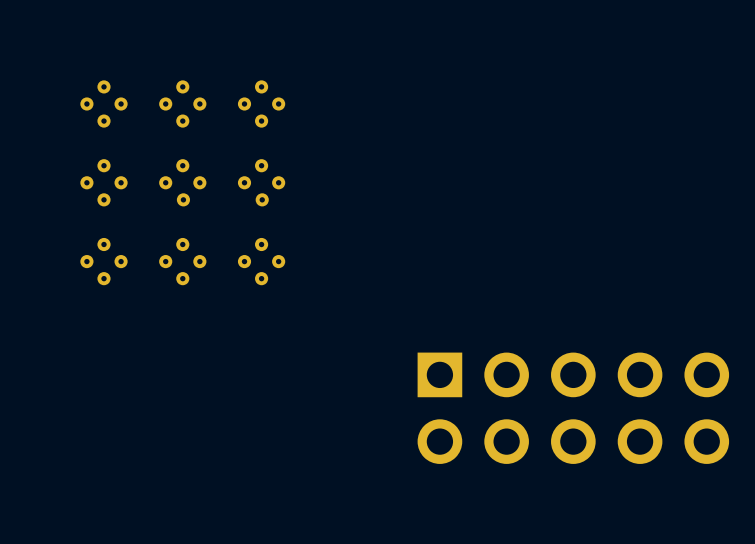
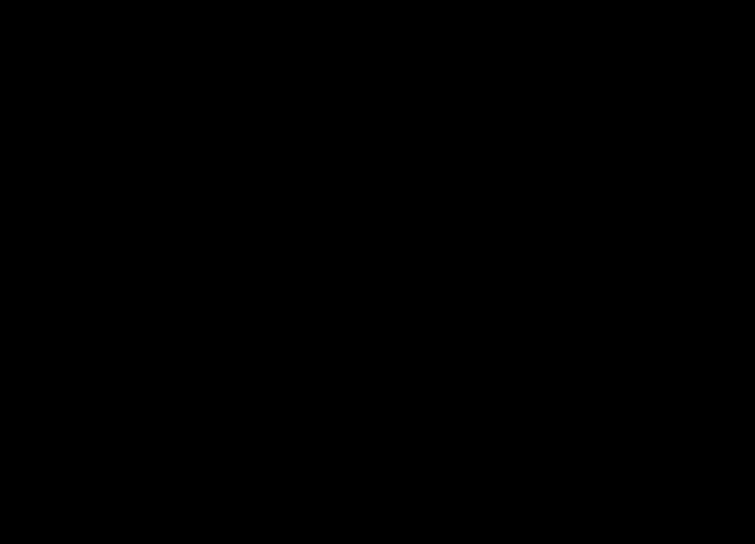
part: (182, 182) -> none
part: (573, 408) -> none

